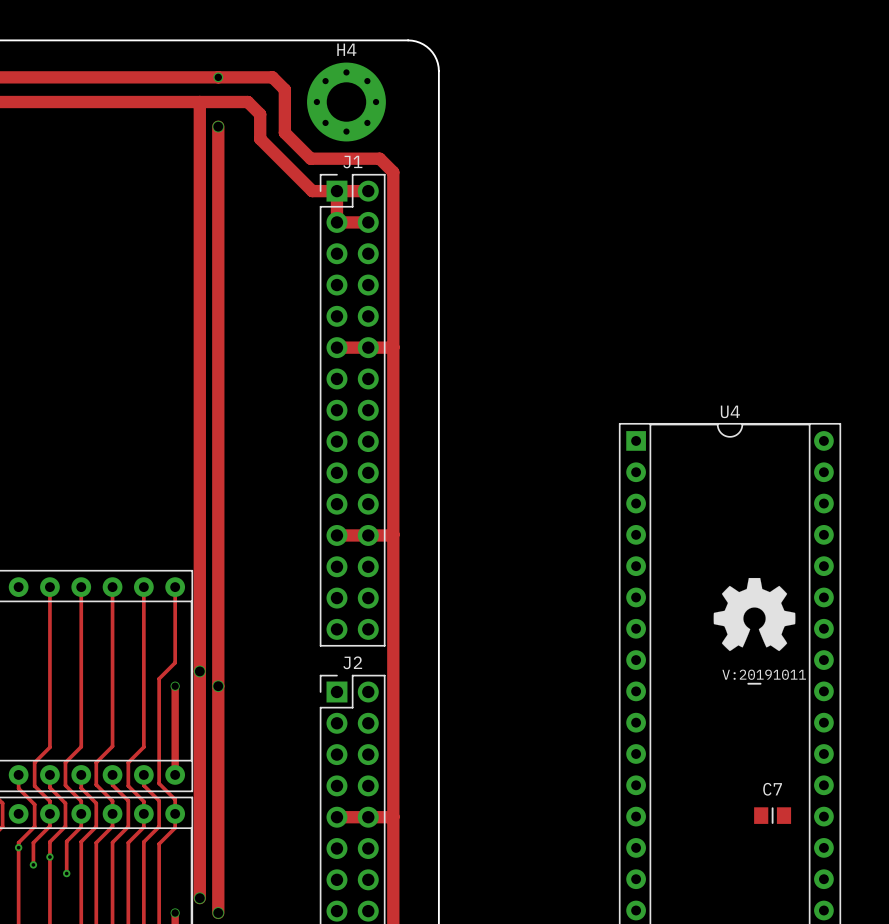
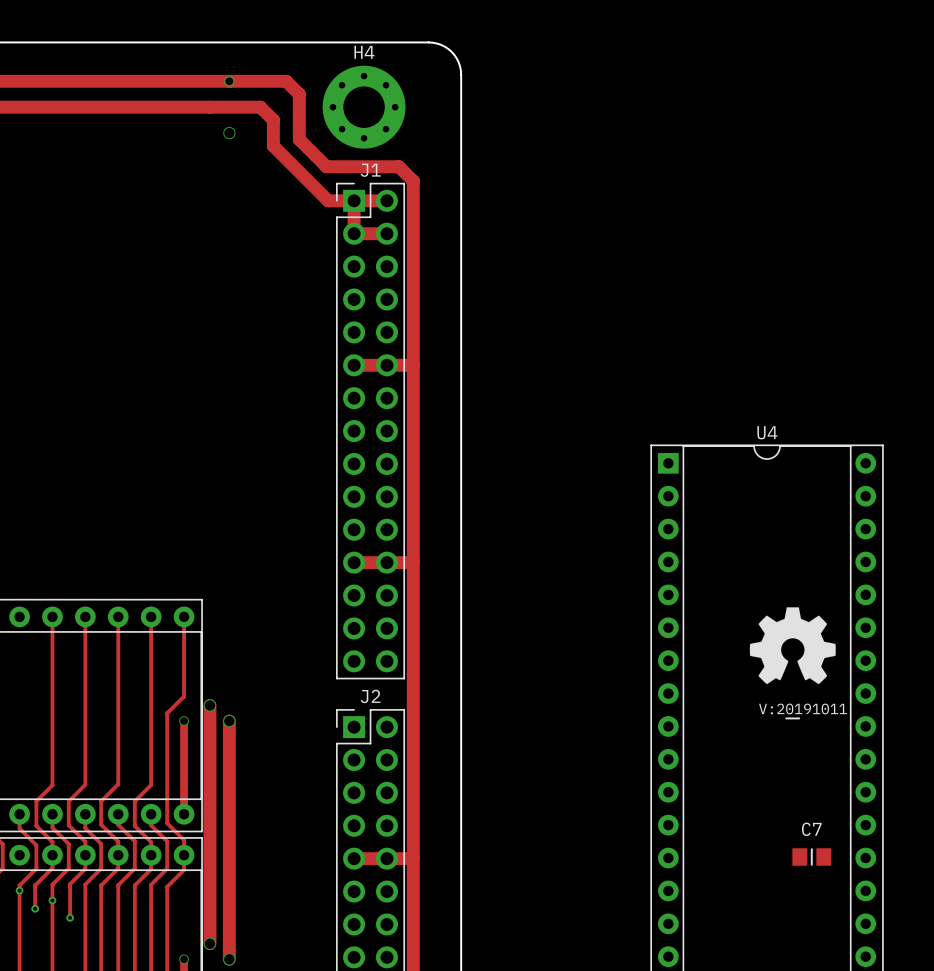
track: (199, 102) (199, 671) -> none
track: (218, 126) (218, 686) -> none

